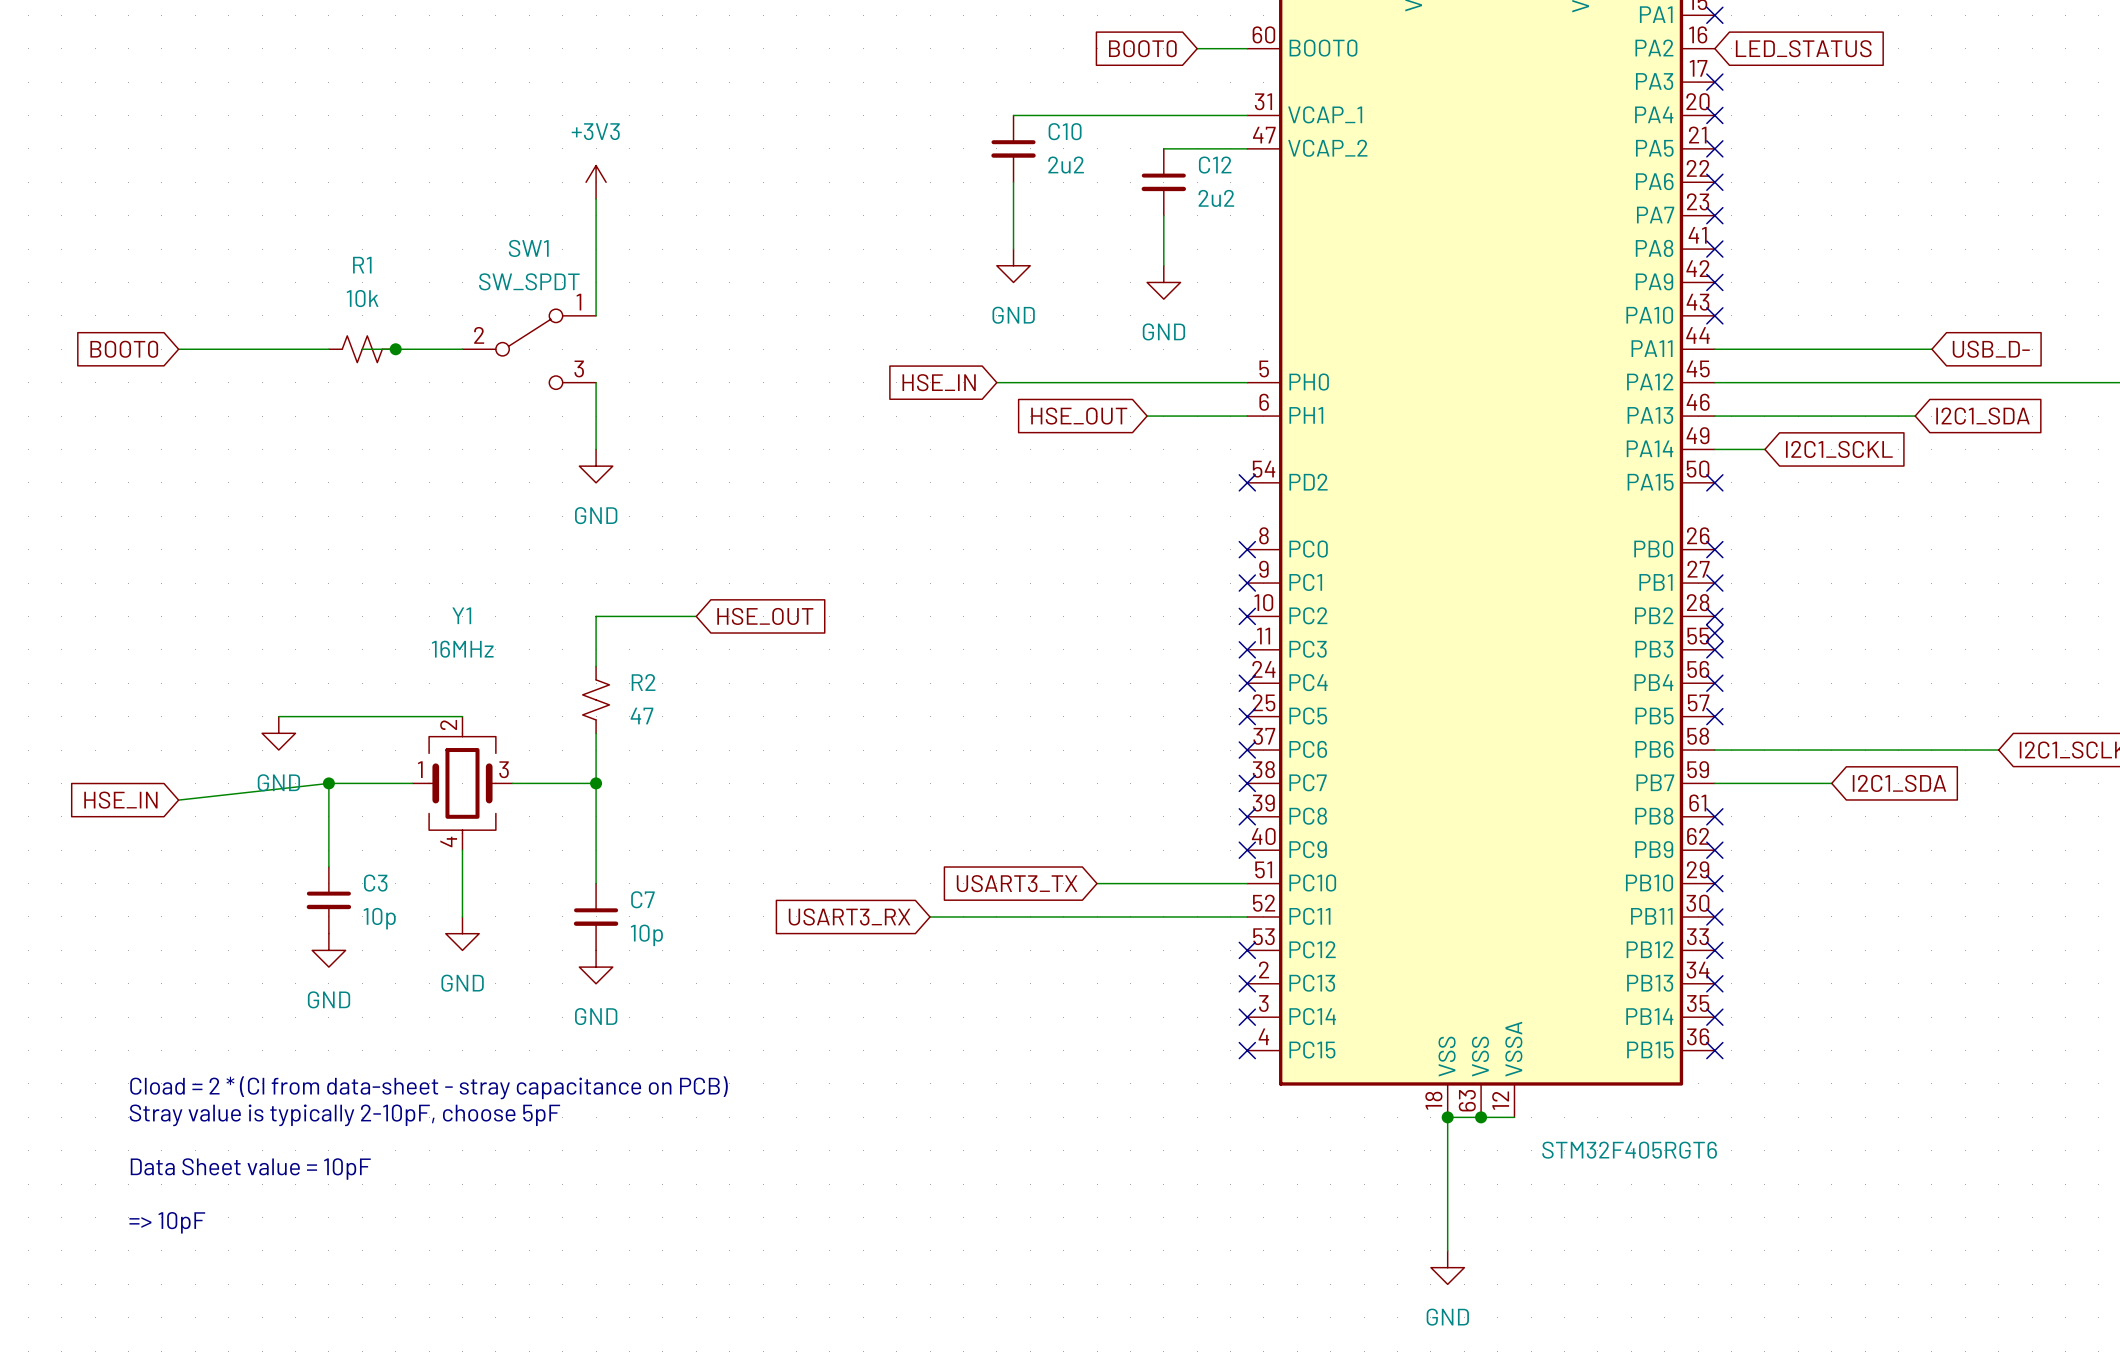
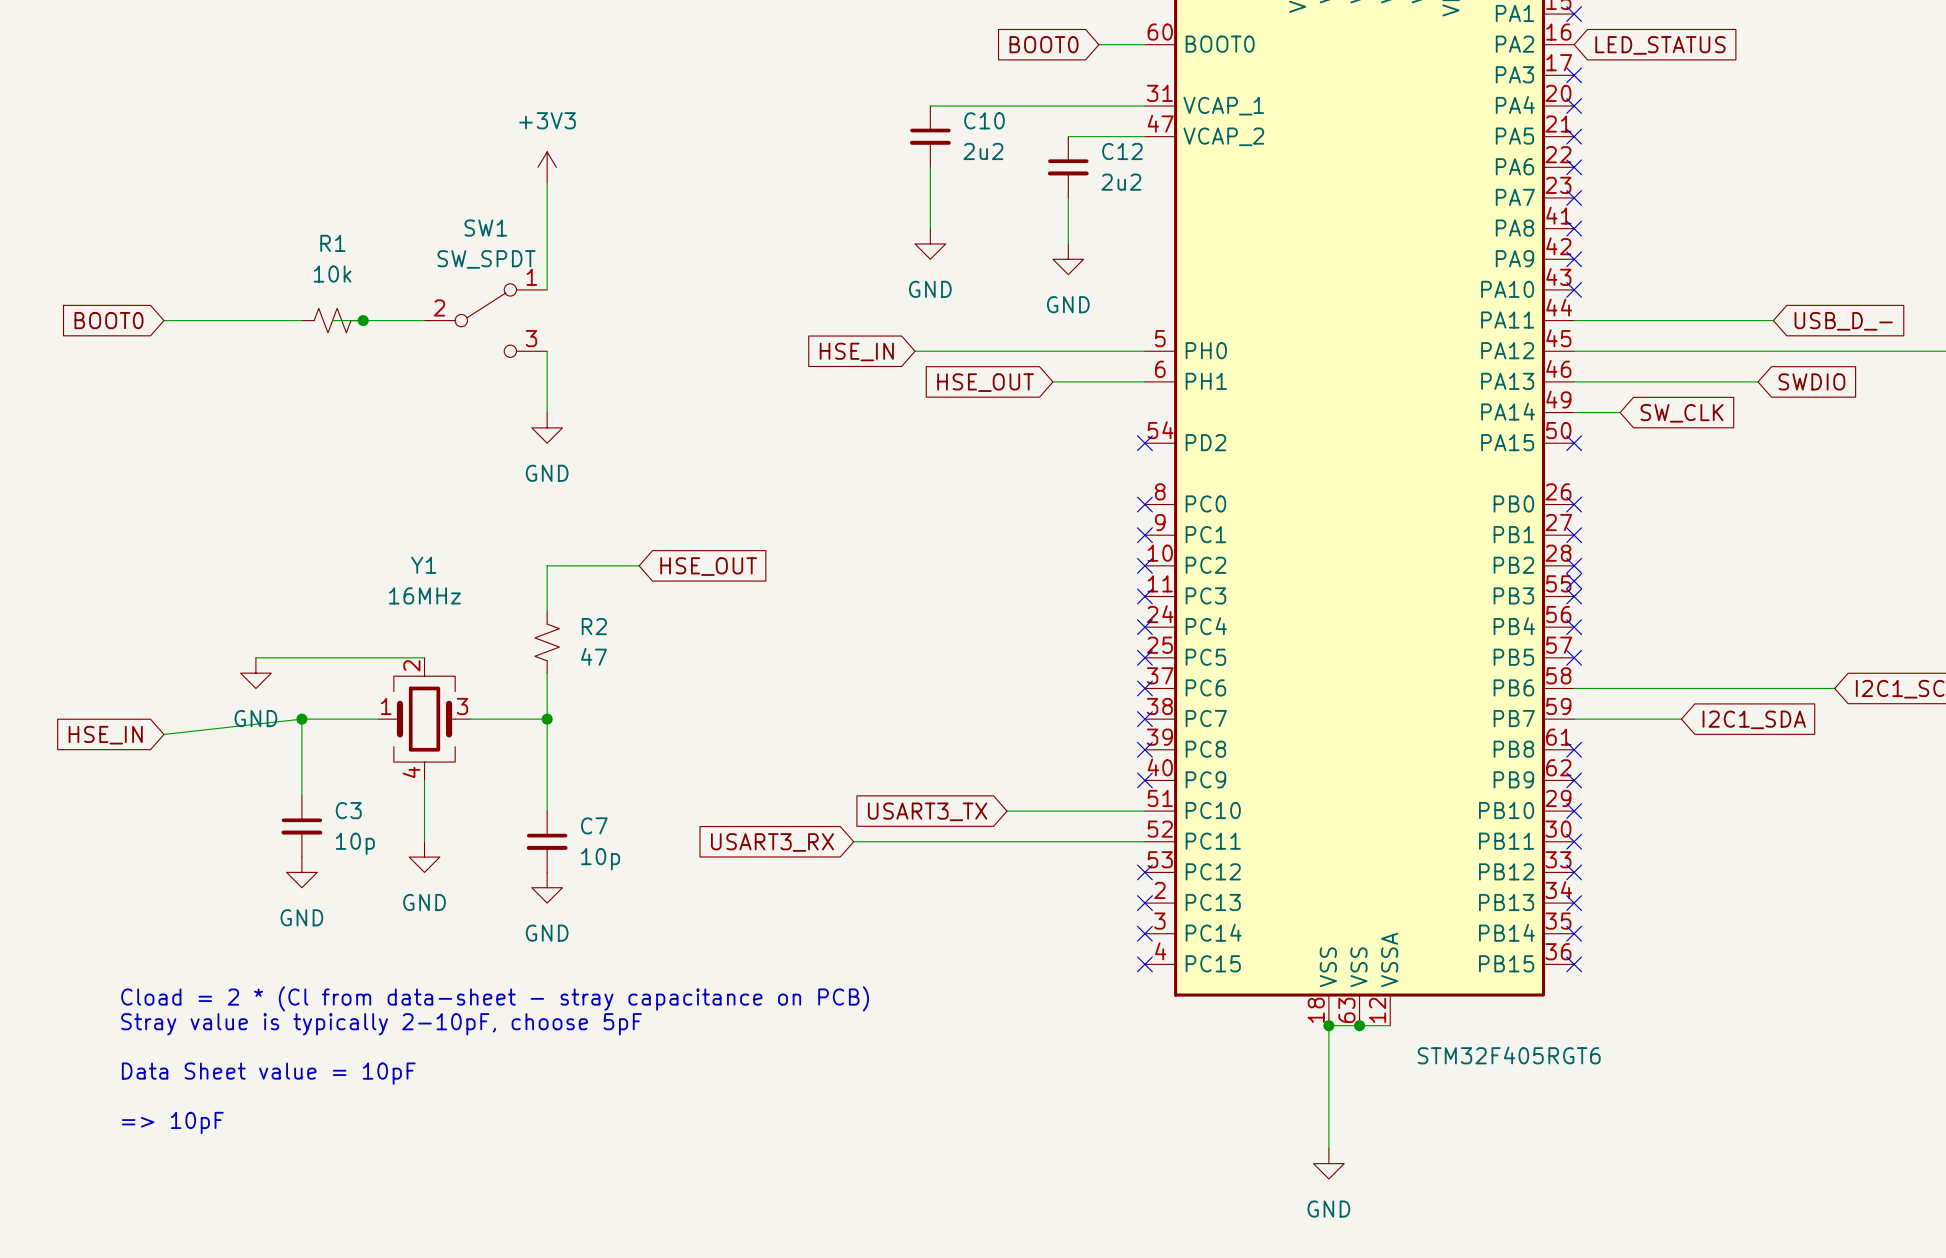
global label: USB_D- (1991, 349) -> USB_D_- (1843, 321)
global label: I2C1_SDA (1982, 416) -> SWDIO (1811, 381)
global label: I2C1_SCKL (1839, 449) -> SW_CLK (1682, 413)

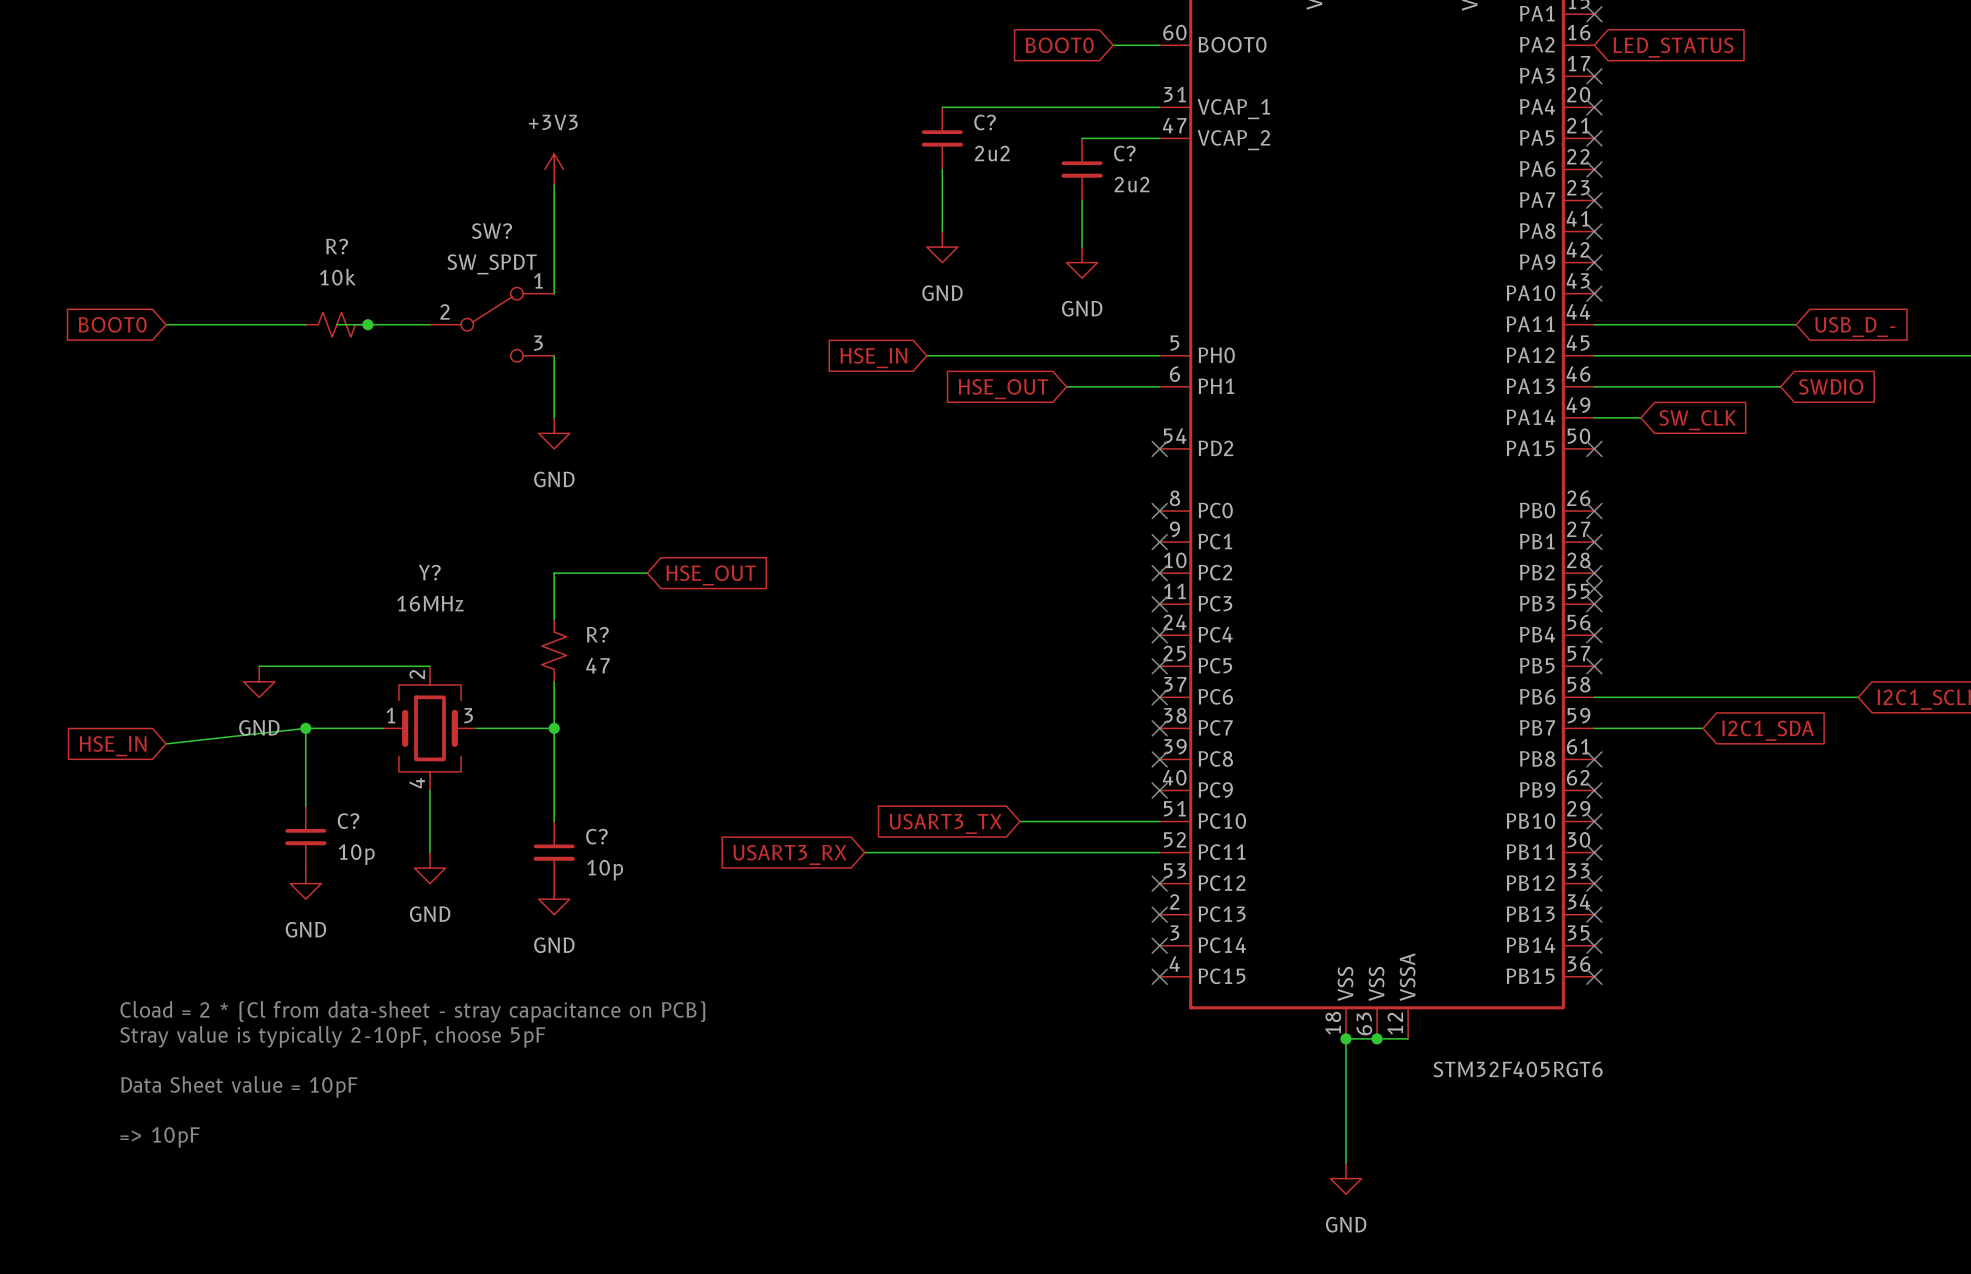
C10 name: C10 (984, 120) -> C? (985, 122)
C12 name: C12 (1122, 151) -> C? (1124, 153)
SW1 name: SW1 (485, 228) -> SW? (492, 231)
R1 name: R1 (332, 243) -> R? (337, 246)
Y1 name: Y1 (423, 565) -> Y? (429, 572)
R2 name: R2 (594, 626) -> R? (597, 634)
C3 name: C3 (348, 810) -> C? (348, 821)
C7 name: C7 (594, 825) -> C? (596, 836)

